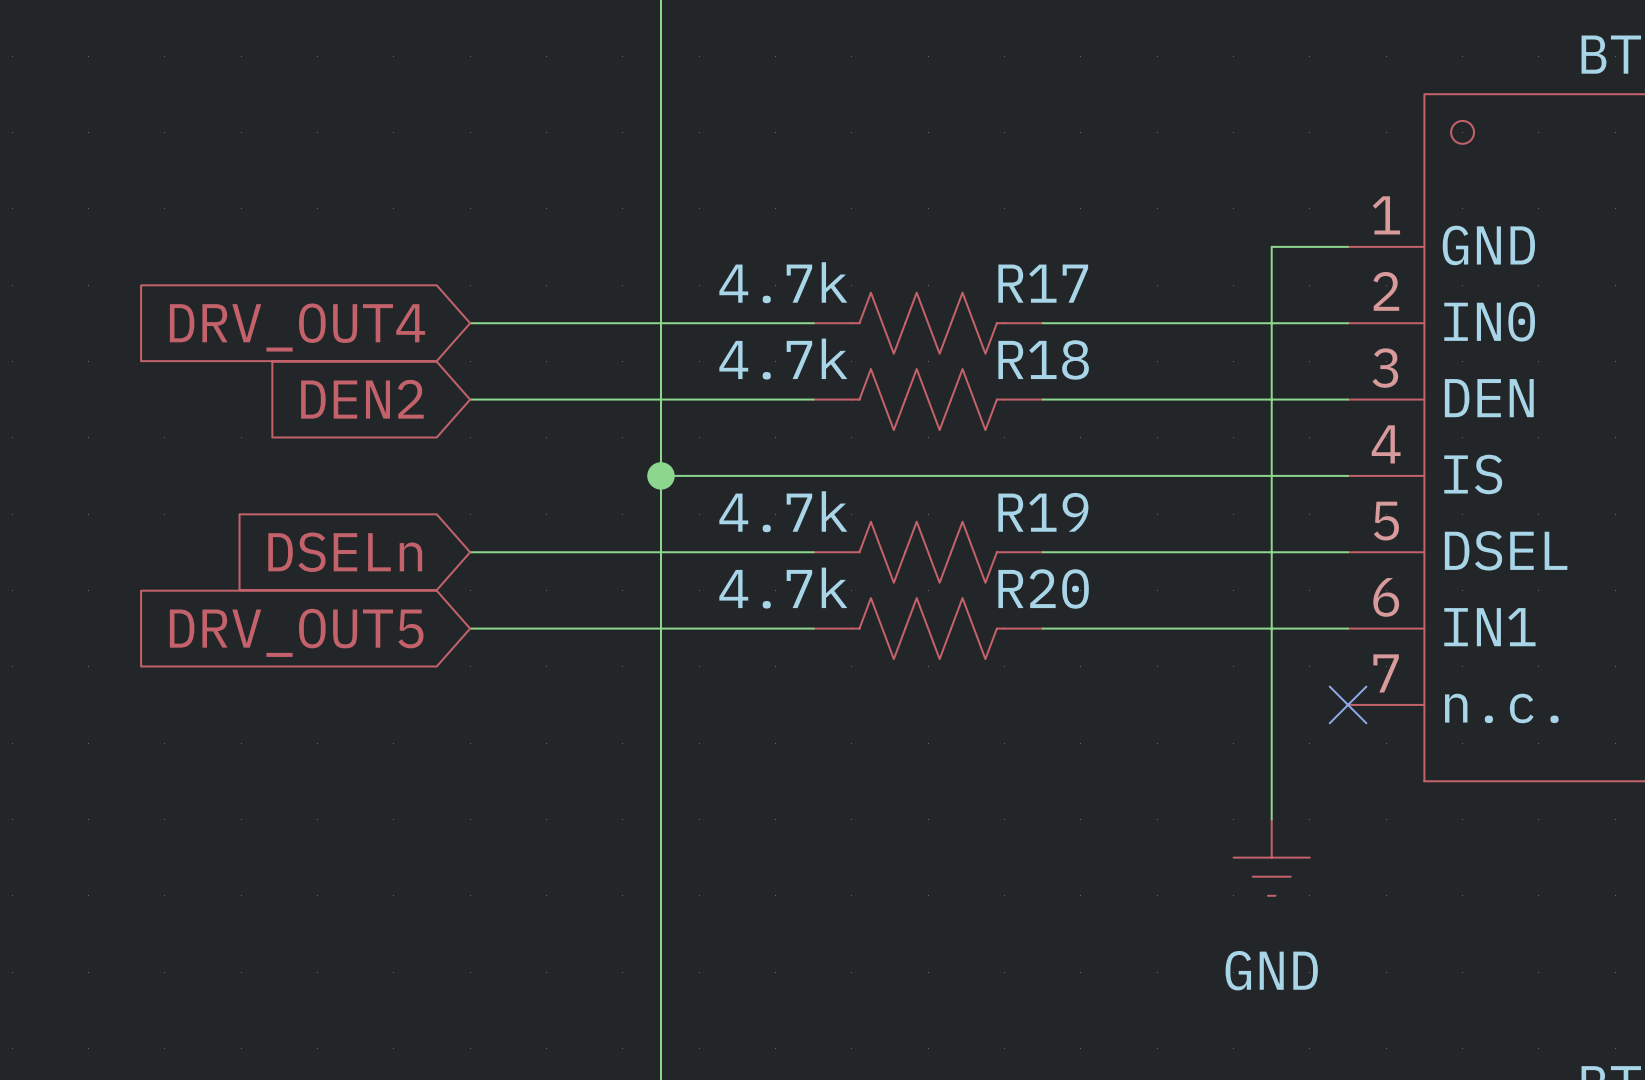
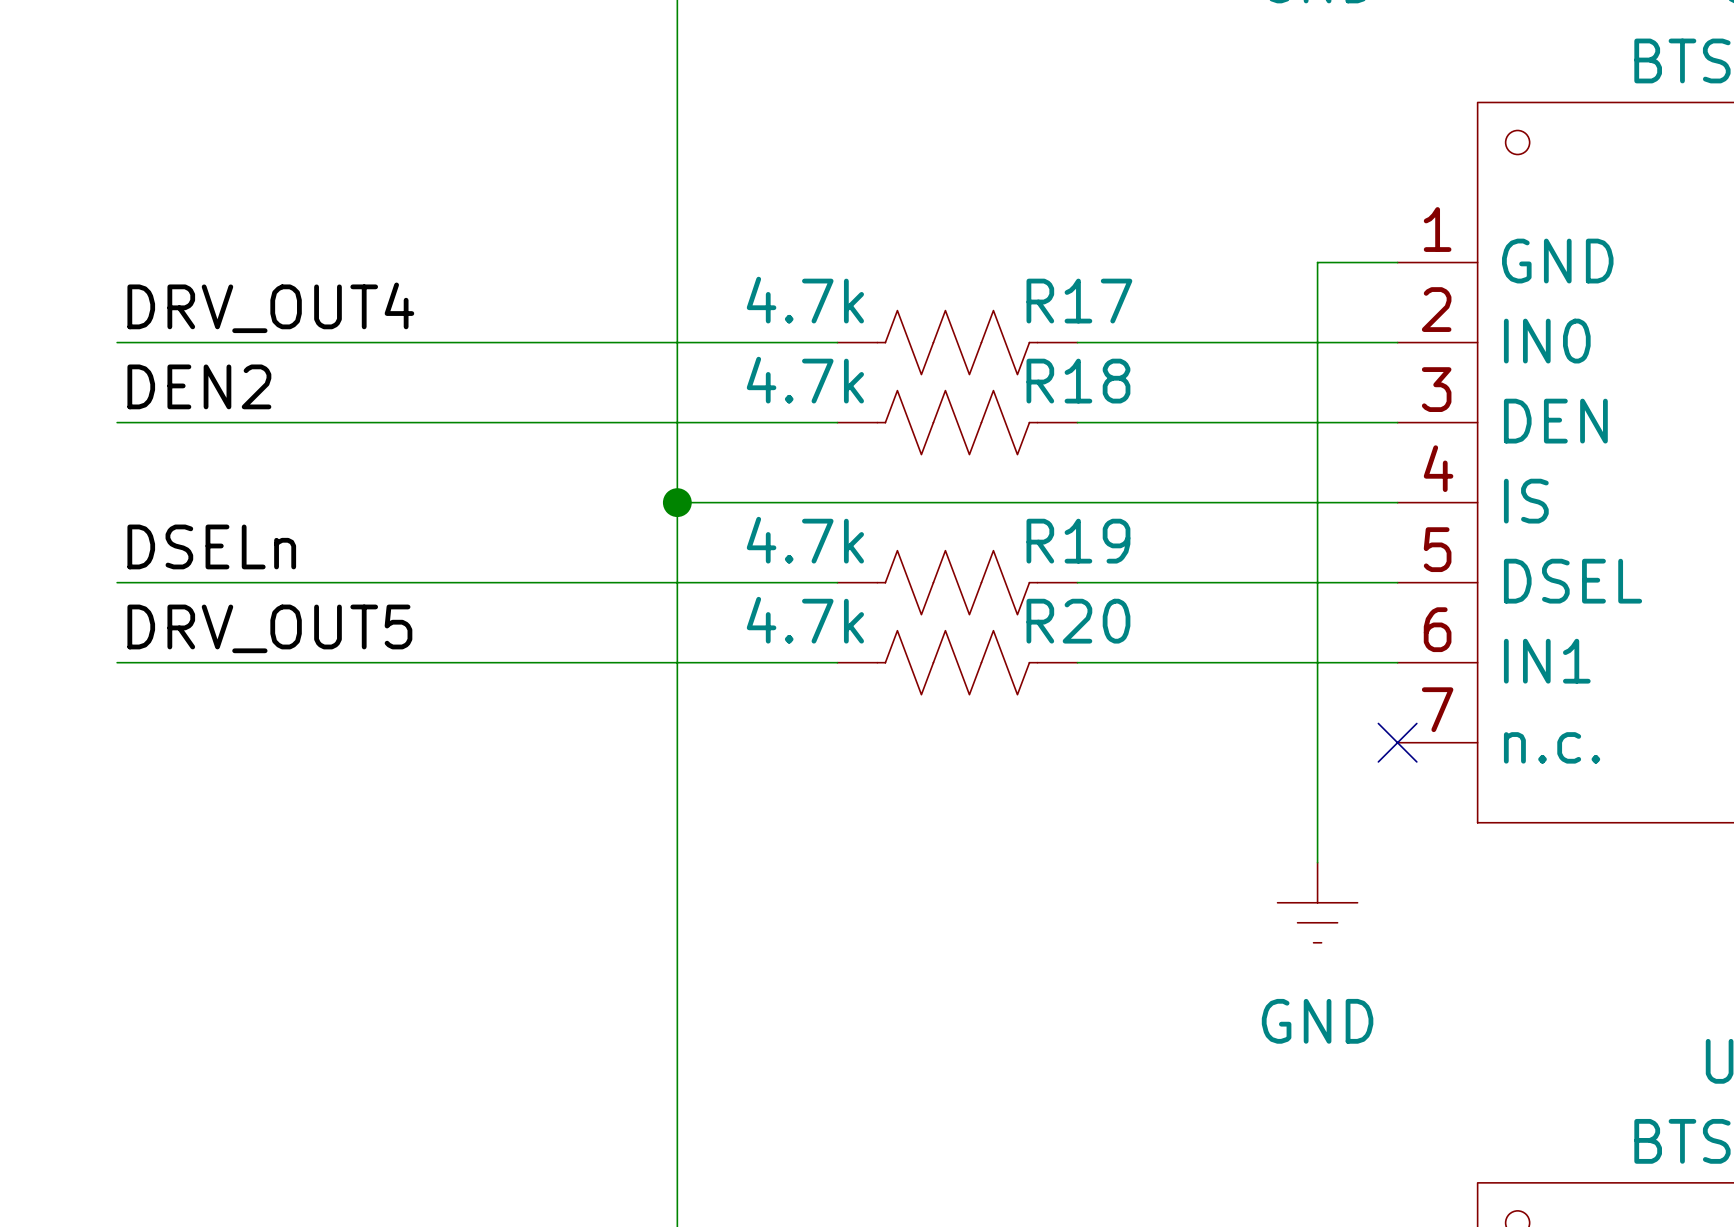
label: none -> DRV_OUT4 (270, 307)
wire: none -> (117, 342) (477, 342)
global label: DRV_OUT4 (297, 327) -> none
label: none -> DEN2 (199, 386)
wire: none -> (117, 422) (477, 422)
global label: DEN2 (362, 399) -> none
label: none -> DSELn (211, 546)
wire: none -> (117, 582) (477, 582)
global label: DSELn (345, 552) -> none
label: none -> DRV_OUT5 (269, 628)
wire: none -> (117, 662) (477, 662)
global label: DRV_OUT5 (296, 632) -> none

